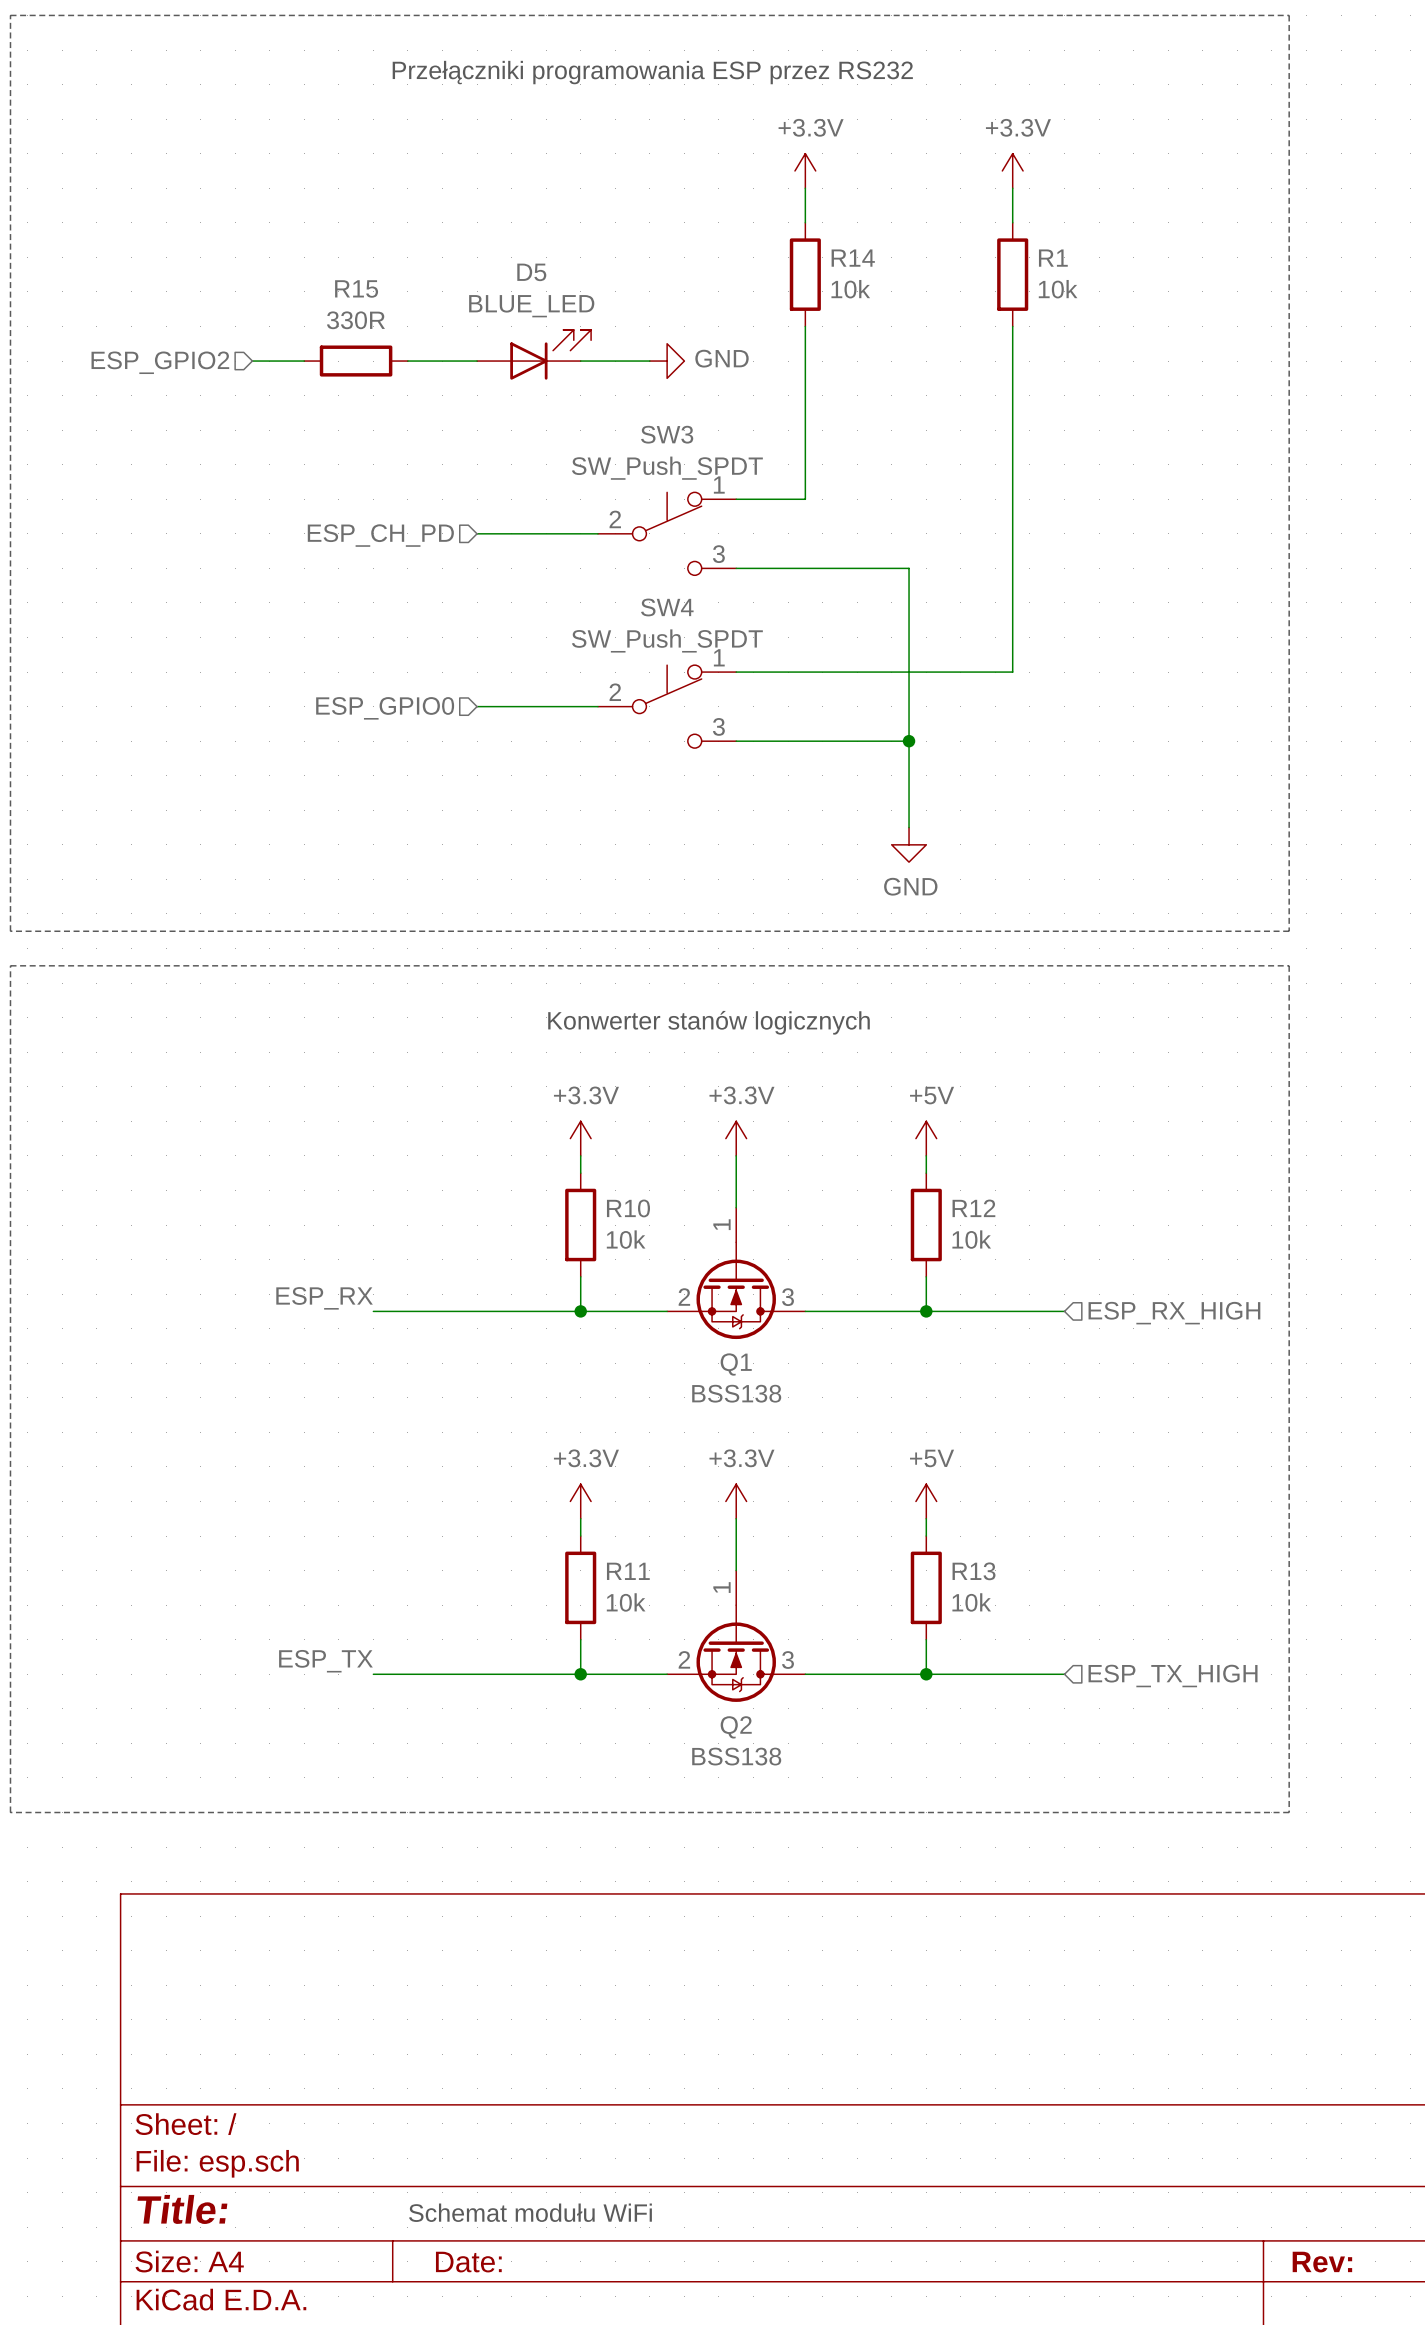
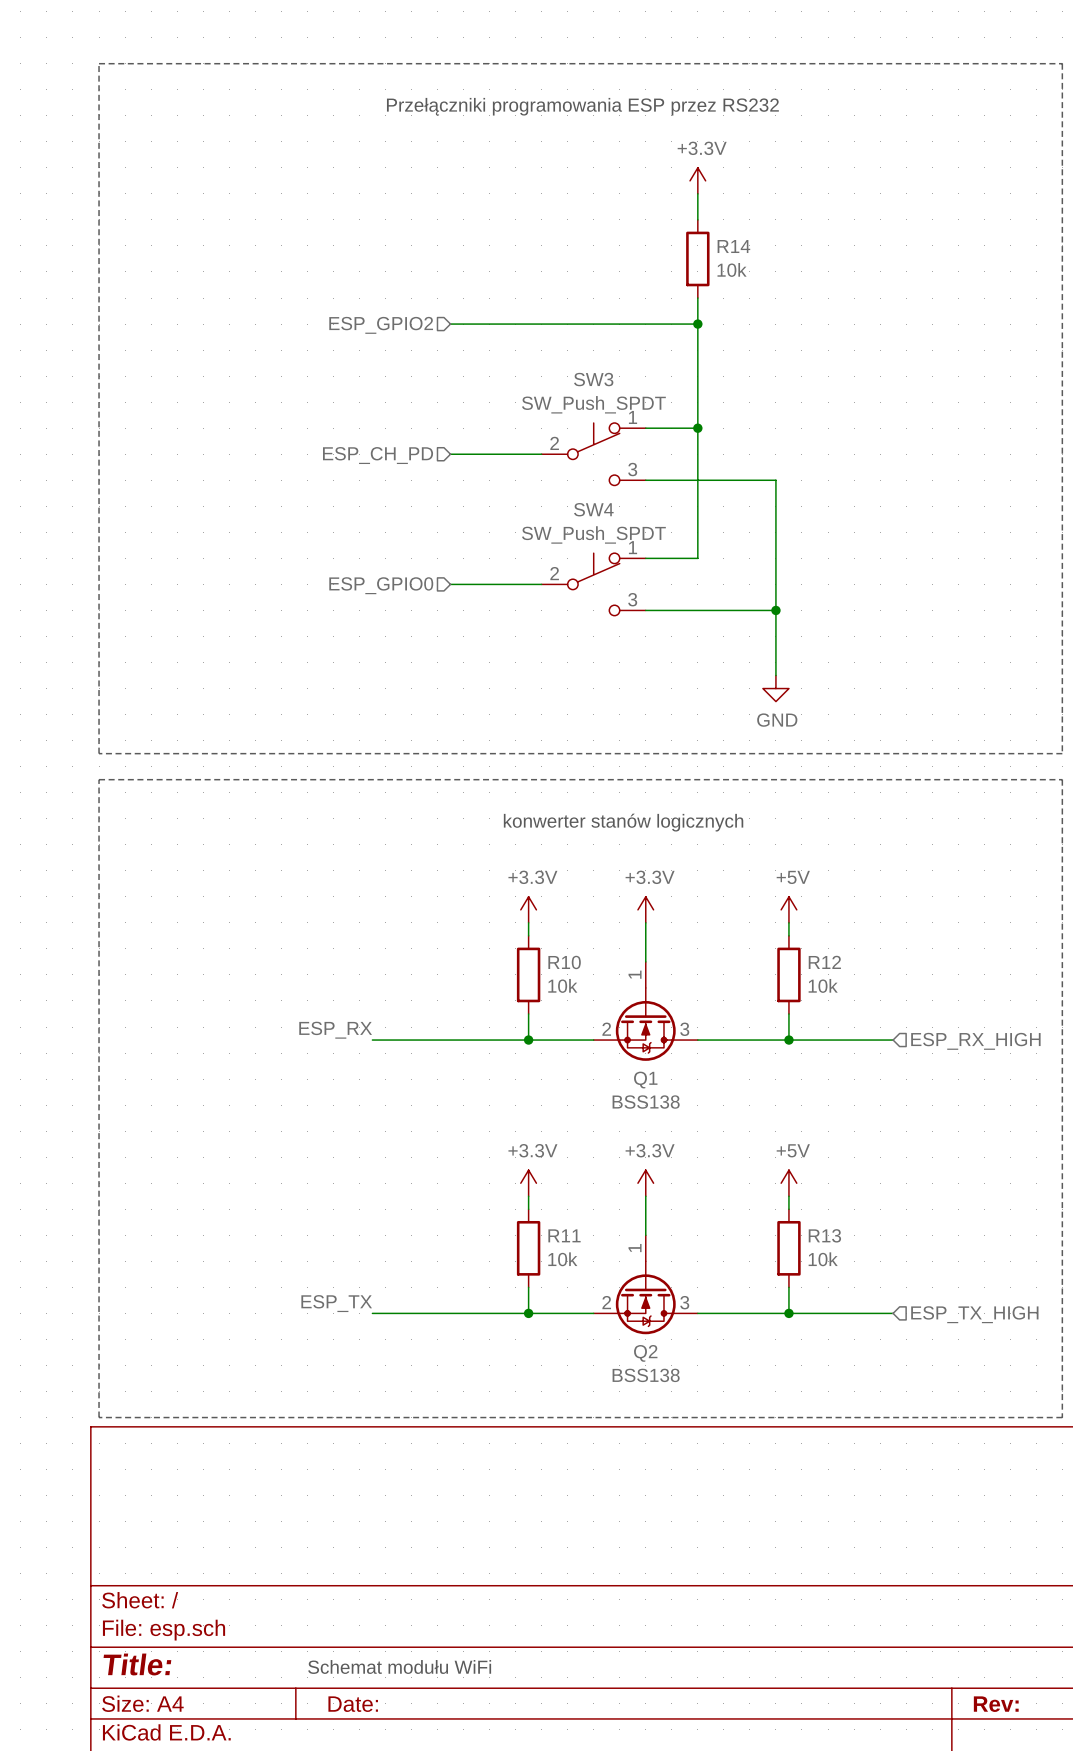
line: (10, 15) (10, 931) (1289, 931) (1289, 15) (10, 15) -> (99, 63) (99, 753) (1062, 753) (1062, 63) (99, 63)
text position: Przełączniki programowania ESP przez RS232 (652, 72) -> Przełączniki programowania ESP przez RS232 (582, 106)
power symbol: +3.3V (805, 170) -> none
power symbol: +3.3V (1012, 170) -> none
wire: (805, 188) (805, 222) -> (697, 193) (697, 219)
wire: (1012, 188) (1012, 222) -> none
power symbol: none -> +3.3V (697, 180)
R14 position: (805, 274) -> (697, 258)
R1: 10k (1012, 274) -> none
wire: (805, 326) (805, 499) (736, 499) -> none
wire: (1012, 326) (1012, 672) (736, 672) -> none
D5: BLUE_LED (534, 354) -> none
wire: (252, 361) (304, 361) -> none
R15: 330R (356, 361) -> none
wire: (407, 361) (477, 361) -> none
wire: (580, 361) (649, 361) -> none
power symbol: GND (667, 361) -> none
hierarchical label: ESP_GPIO2 (160, 362) -> none
wire: none -> (697, 298) (697, 558) (684, 558)
wire: none -> (450, 324) (697, 324)
junction: none -> (697, 324)
hierarchical label: none -> ESP_GPIO2 (381, 325)
wire: (477, 533) (597, 533) -> (450, 454) (541, 454)
SW3 position: (667, 533) -> (593, 454)
hierarchical label position: ESP_CH_PD (380, 535) -> ESP_CH_PD (378, 455)
wire: (736, 568) (857, 568) -> none
wire: (909, 568) (909, 827) -> (684, 428) (697, 428)
junction: none -> (697, 428)
wire: none -> (645, 480) (775, 480) (775, 675)
wire: (477, 706) (597, 706) -> (450, 584) (541, 584)
SW4 position: (667, 706) -> (593, 584)
hierarchical label position: ESP_GPIO0 (385, 708) -> ESP_GPIO0 (381, 585)
wire: (736, 741) (857, 741) -> none
junction: (909, 741) -> none
wire: none -> (645, 610) (775, 610)
junction: none -> (775, 610)
power symbol position: GND (909, 844) -> GND (775, 688)
line: (10, 965) (10, 1812) (1289, 1812) (1289, 965) (10, 965) -> (99, 779) (99, 1417) (1062, 1417) (1062, 779) (99, 779)
text: Konwerter stanów logicznych (709, 1022) -> none
text: none -> konwerter stanów logicznych (623, 822)
power symbol: +3.3V (580, 1138) -> none
power symbol: +3.3V (736, 1138) -> none
power symbol position: +5V (926, 1138) -> +5V (788, 909)
wire: (580, 1155) (580, 1173) -> (528, 922) (528, 935)
wire: (736, 1155) (736, 1207) -> (645, 922) (645, 961)
wire: (926, 1155) (926, 1173) -> (788, 922) (788, 935)
power symbol: none -> +3.3V (528, 909)
power symbol: none -> +3.3V (645, 909)
R10 position: (580, 1225) -> (528, 974)
R12 position: (926, 1225) -> (788, 974)
Q1 position: (736, 1273) -> (645, 1011)
wire: (580, 1276) (580, 1311) -> (528, 1014) (528, 1040)
wire: (926, 1276) (926, 1311) -> (788, 1014) (788, 1040)
label position: ESP_RX (324, 1298) -> ESP_RX (335, 1030)
wire: (373, 1311) (667, 1311) -> (372, 1040) (593, 1040)
junction: (580, 1311) -> none
wire: (805, 1311) (1064, 1311) -> (697, 1040) (893, 1040)
junction: (926, 1311) -> none
hierarchical label position: ESP_RX_HIGH (1174, 1313) -> ESP_RX_HIGH (975, 1041)
junction: none -> (528, 1040)
junction: none -> (788, 1040)
power symbol: +3.3V (580, 1501) -> none
power symbol: +3.3V (736, 1501) -> none
power symbol position: +5V (926, 1501) -> +5V (788, 1183)
wire: (580, 1518) (580, 1536) -> (528, 1196) (528, 1209)
wire: (736, 1518) (736, 1570) -> (645, 1196) (645, 1235)
wire: (926, 1518) (926, 1536) -> (788, 1196) (788, 1209)
power symbol: none -> +3.3V (528, 1183)
power symbol: none -> +3.3V (645, 1183)
R11 position: (580, 1587) -> (528, 1248)
R13 position: (926, 1587) -> (788, 1248)
Q2 position: (736, 1636) -> (645, 1284)
wire: (580, 1639) (580, 1674) -> (528, 1287) (528, 1313)
wire: (926, 1639) (926, 1674) -> (788, 1287) (788, 1313)
label position: ESP_TX (325, 1661) -> ESP_TX (336, 1303)
wire: (373, 1674) (667, 1674) -> (372, 1313) (593, 1313)
junction: (580, 1674) -> none
wire: (805, 1674) (1064, 1674) -> (697, 1313) (893, 1313)
junction: (926, 1674) -> none
hierarchical label position: ESP_TX_HIGH (1173, 1676) -> ESP_TX_HIGH (974, 1314)
junction: none -> (528, 1313)
junction: none -> (788, 1313)

